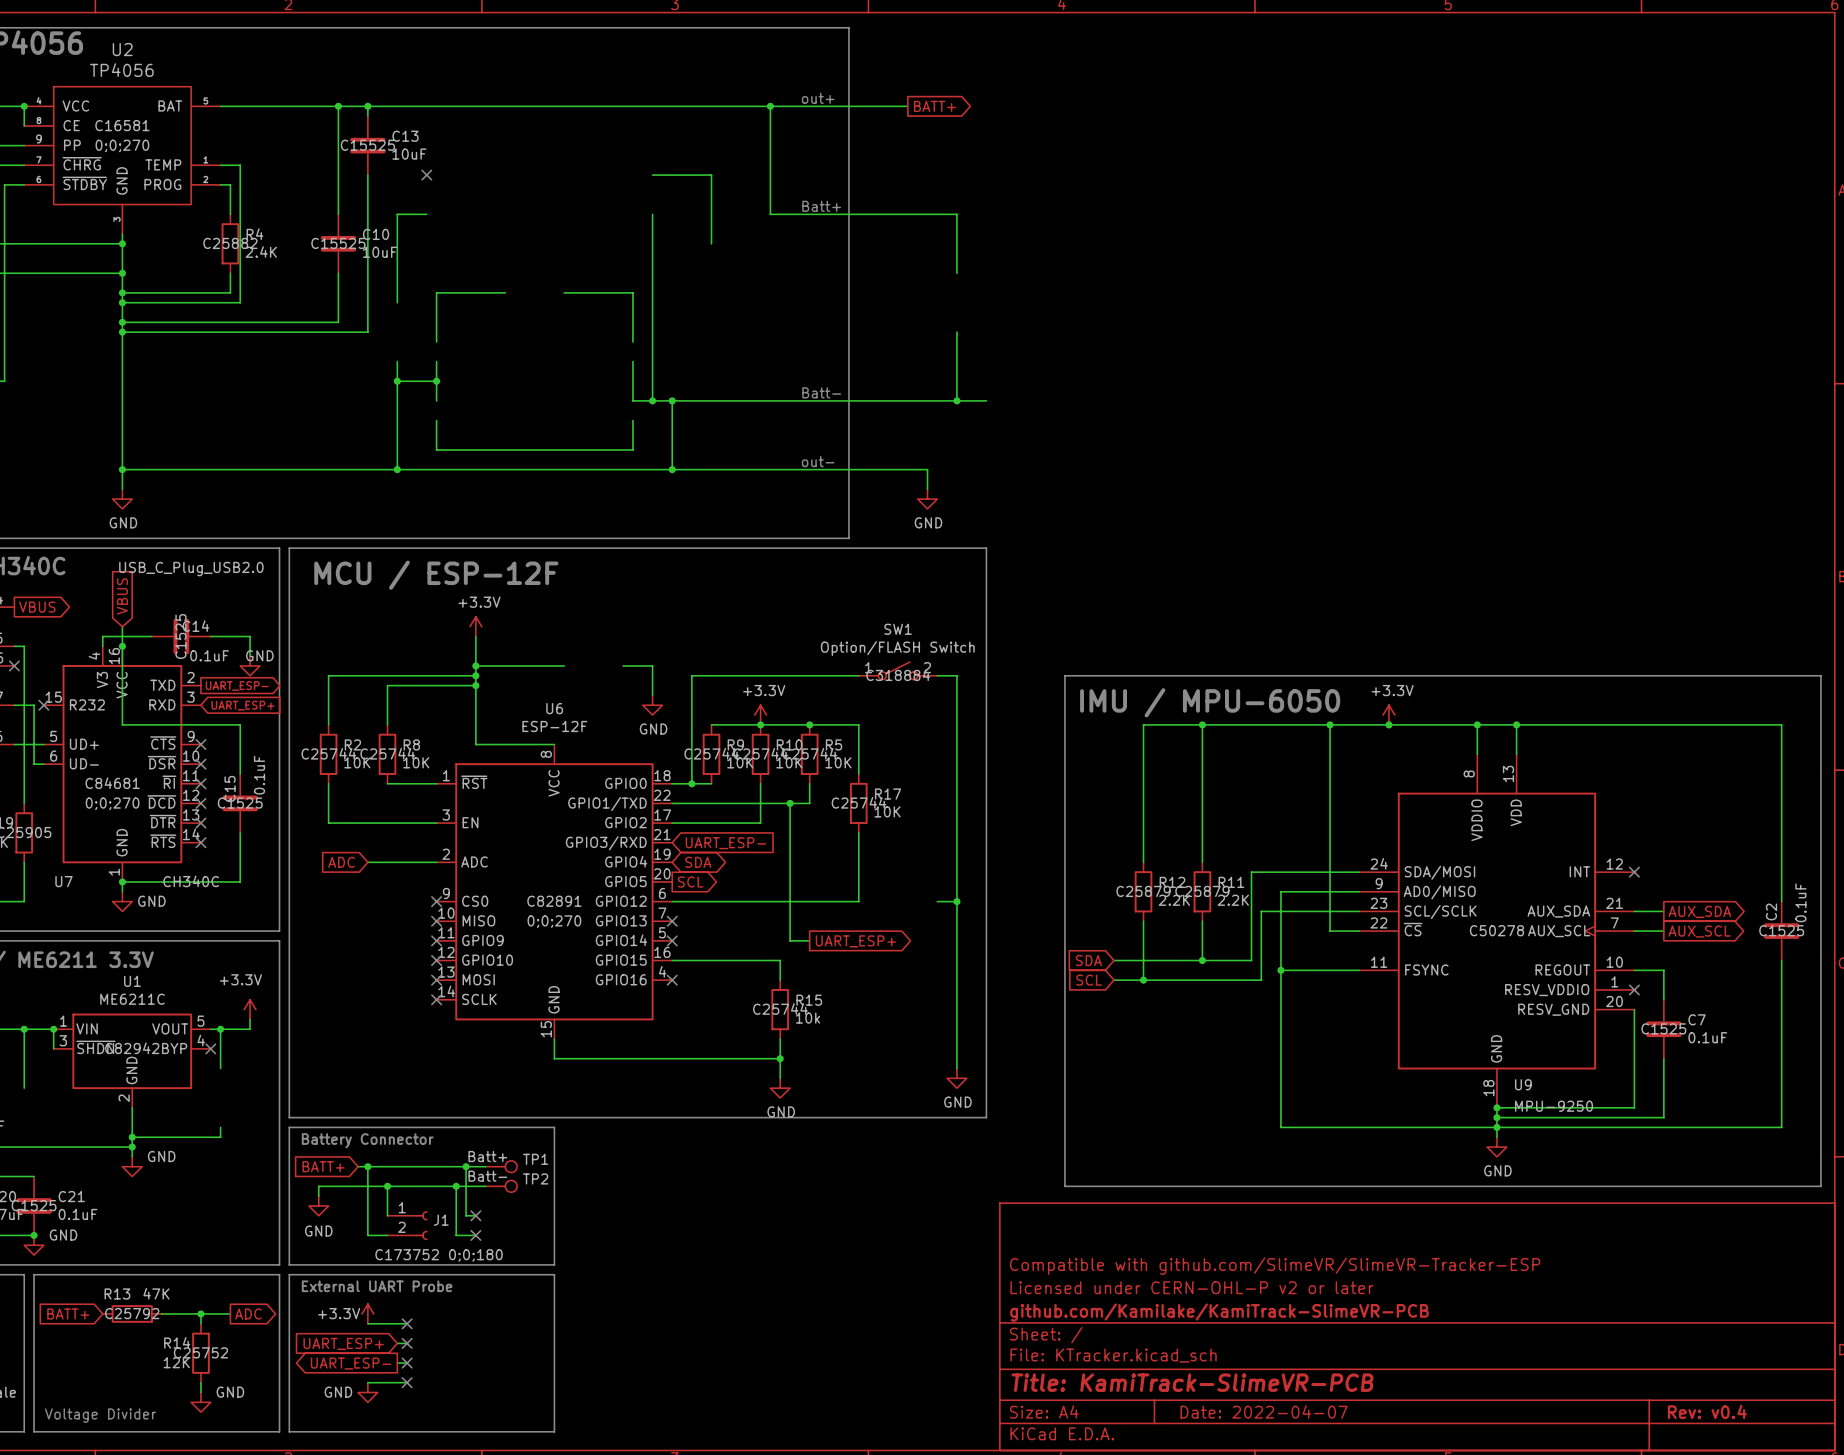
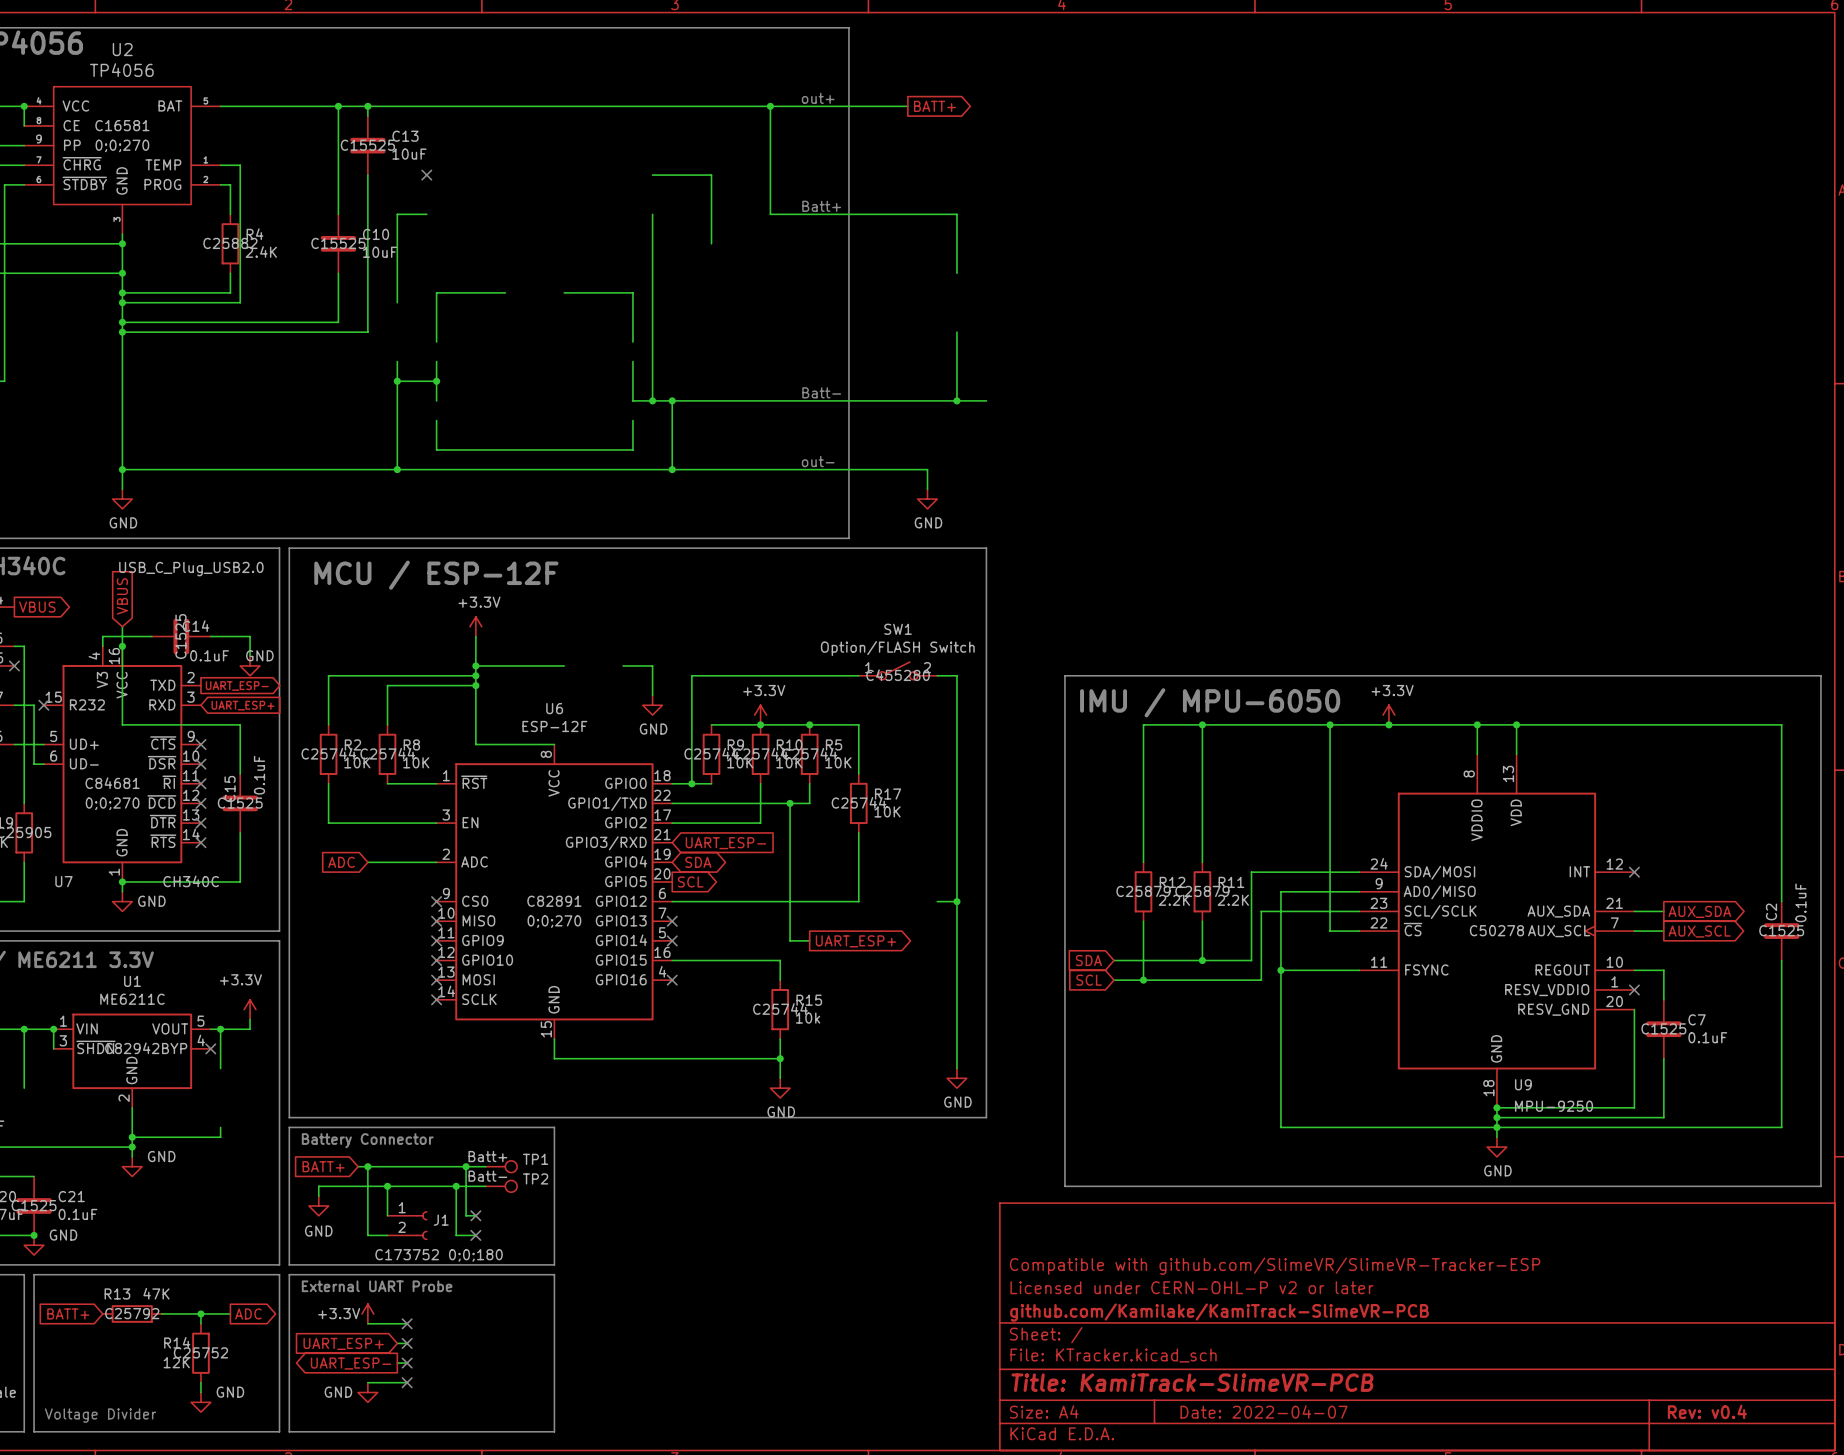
SW1 text: C318884 (898, 675) -> C455280 (898, 675)

